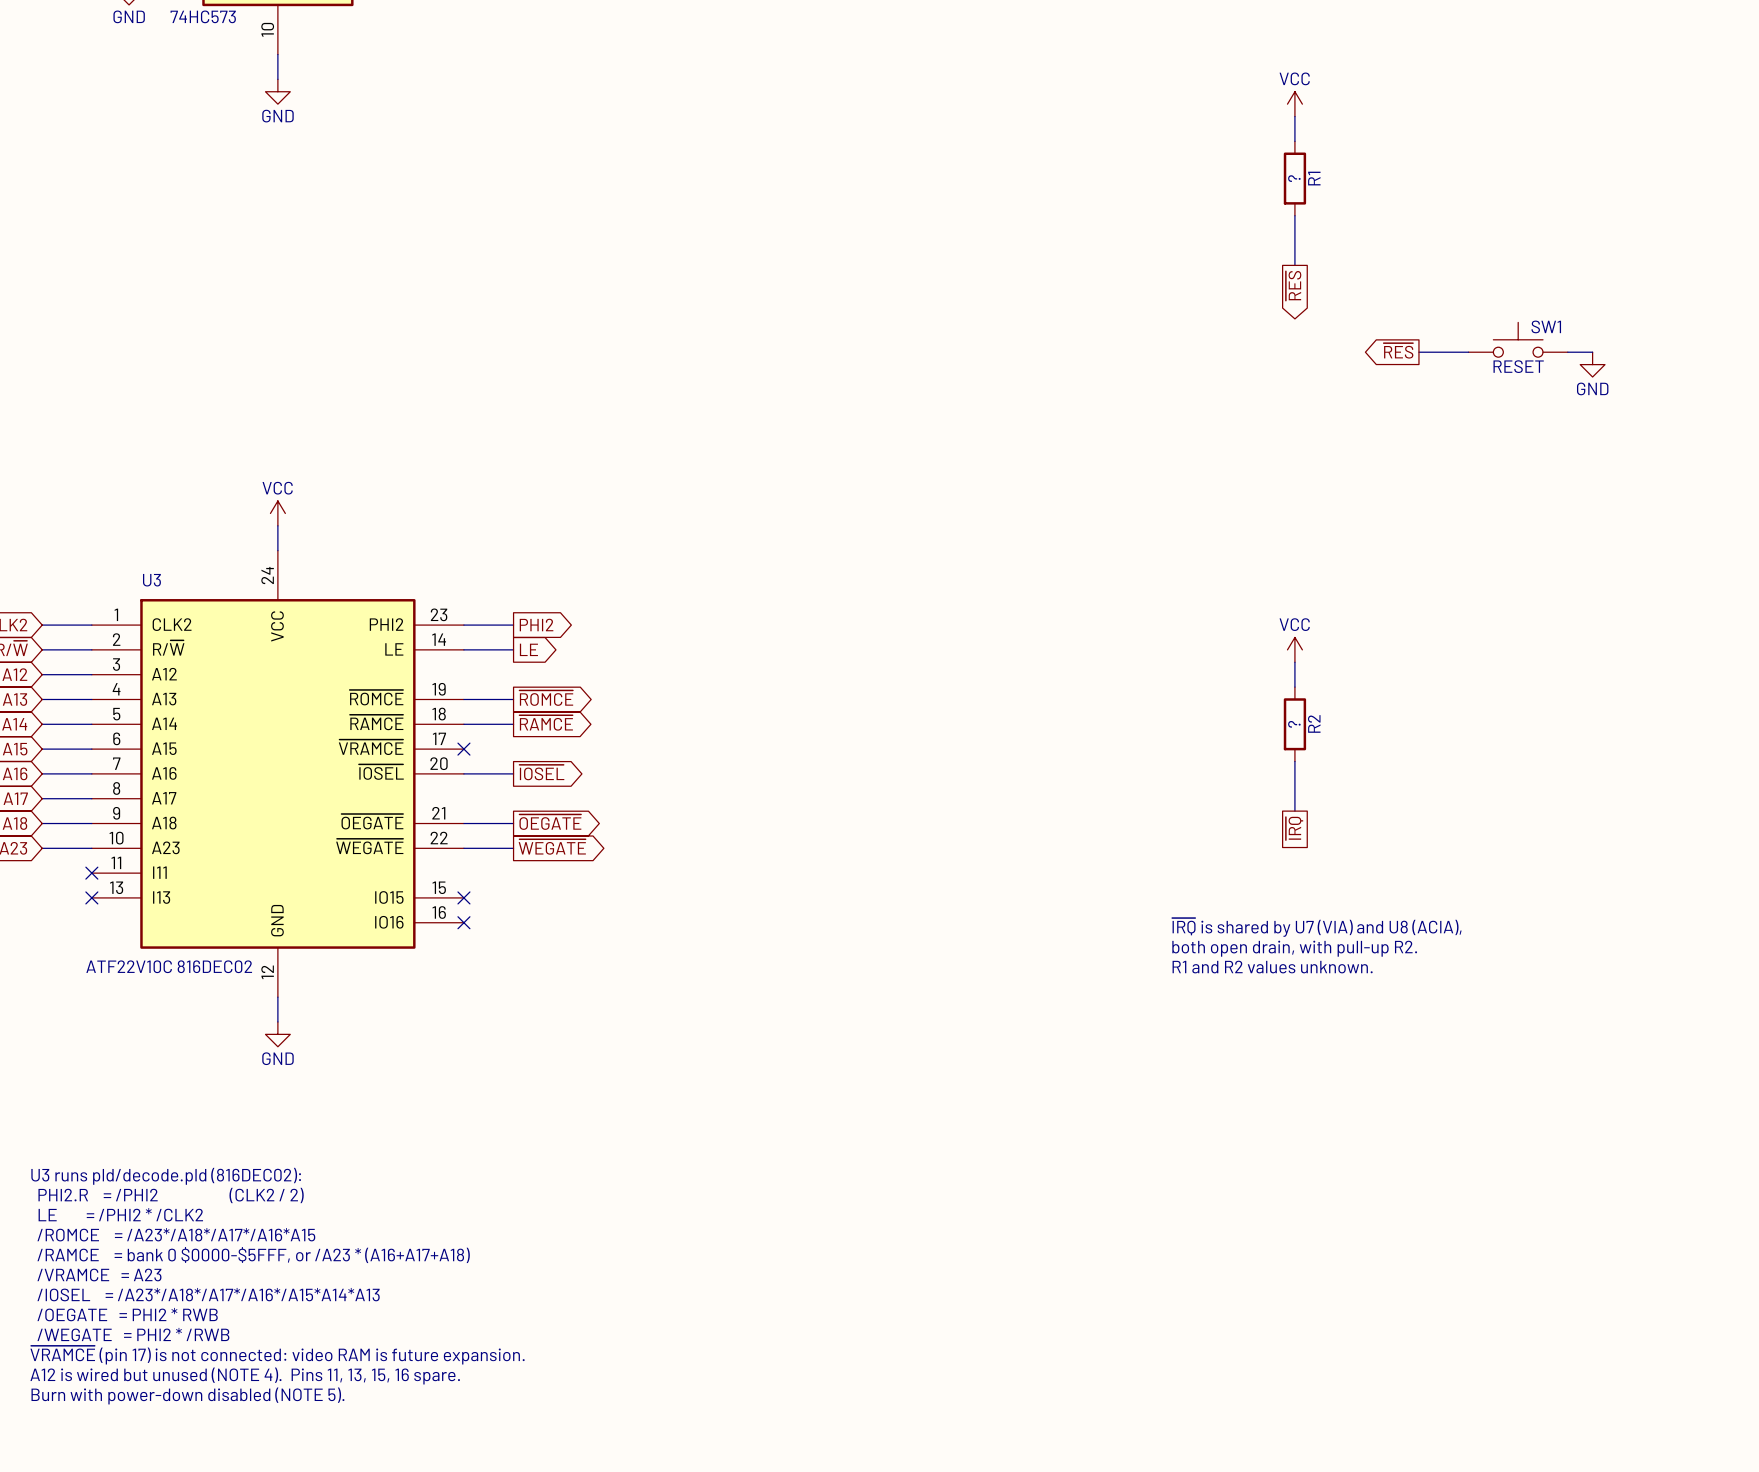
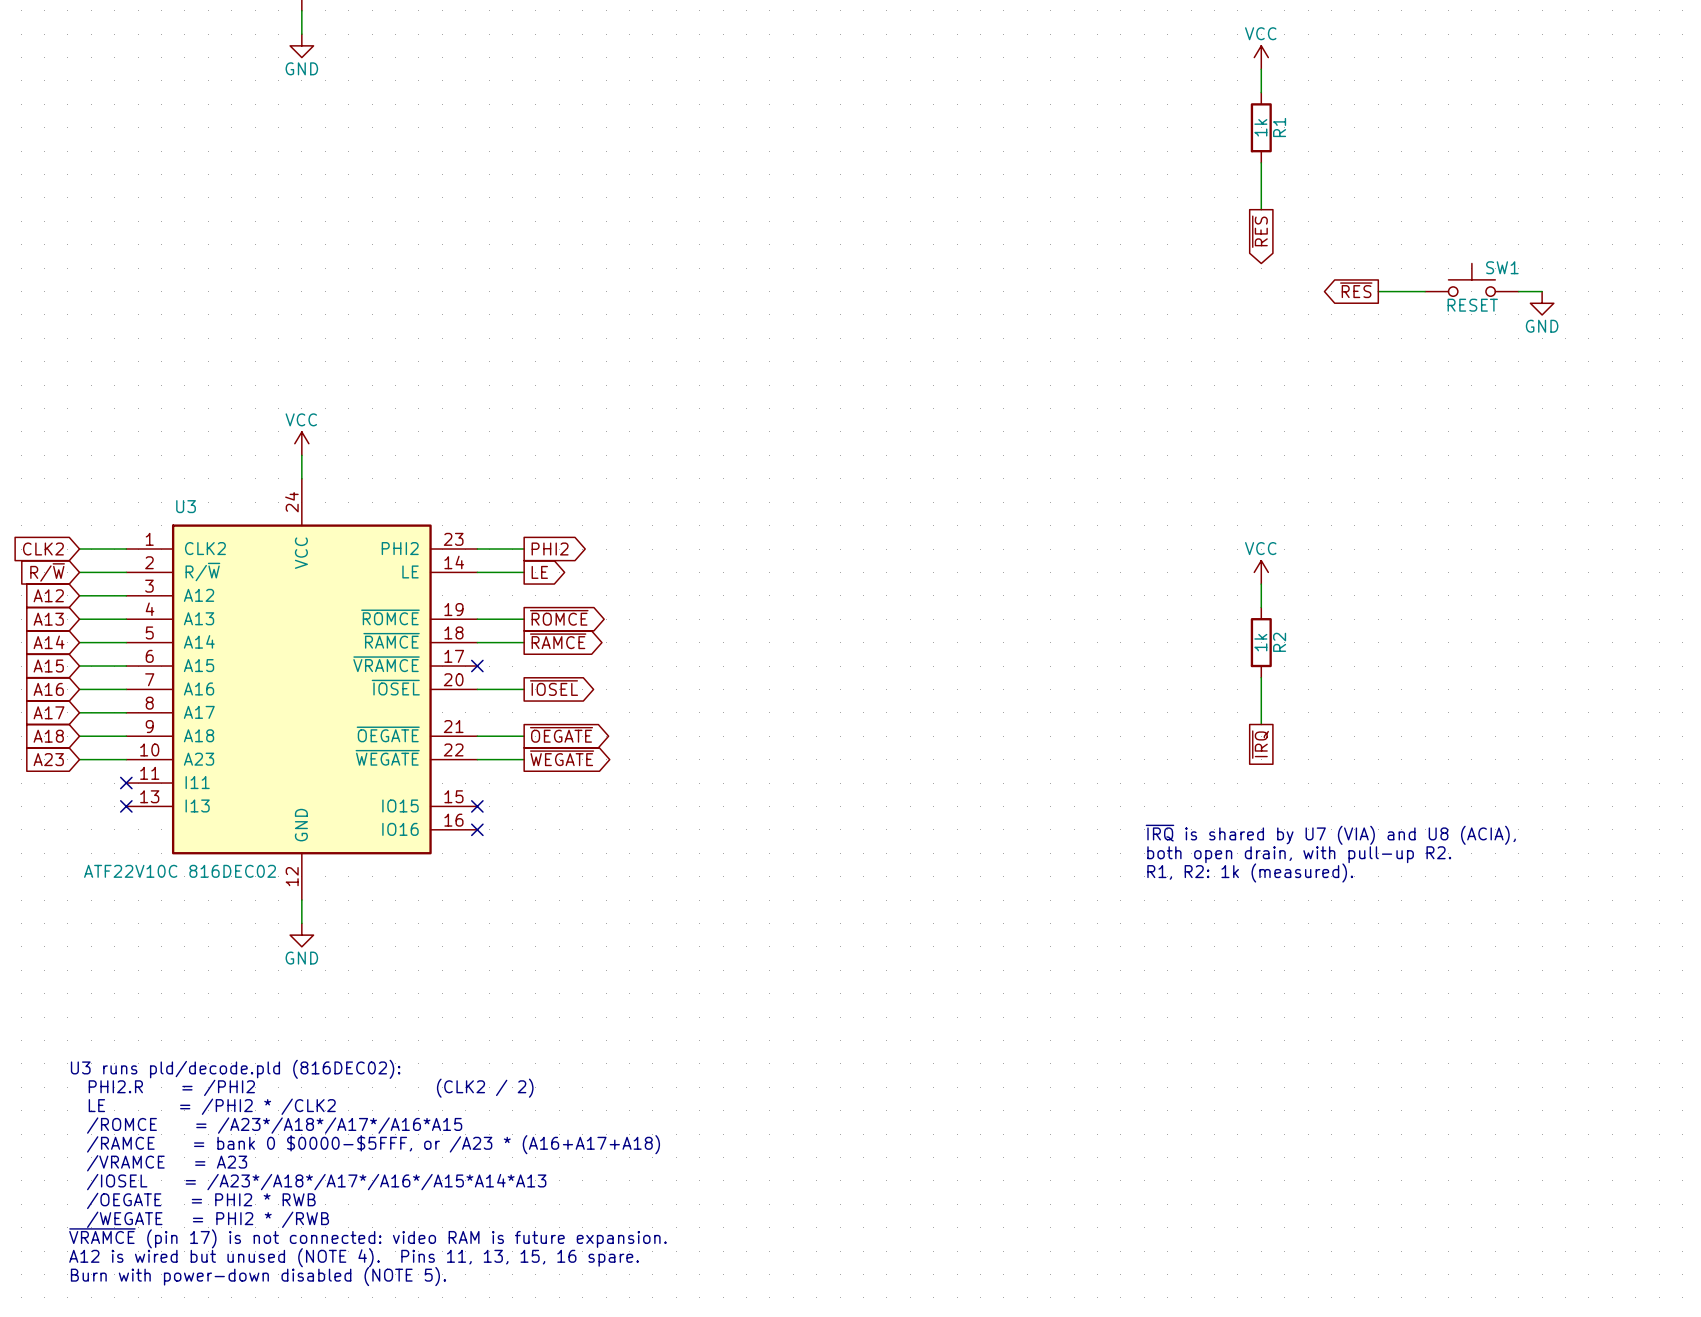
R1 value: ? (1294, 178) -> 1k (1260, 127)
R2 value: ? (1294, 724) -> 1k (1260, 642)
text: R1 and R2 values unknown. (1272, 967) -> R1, R2: 1k (measured). (1250, 872)

